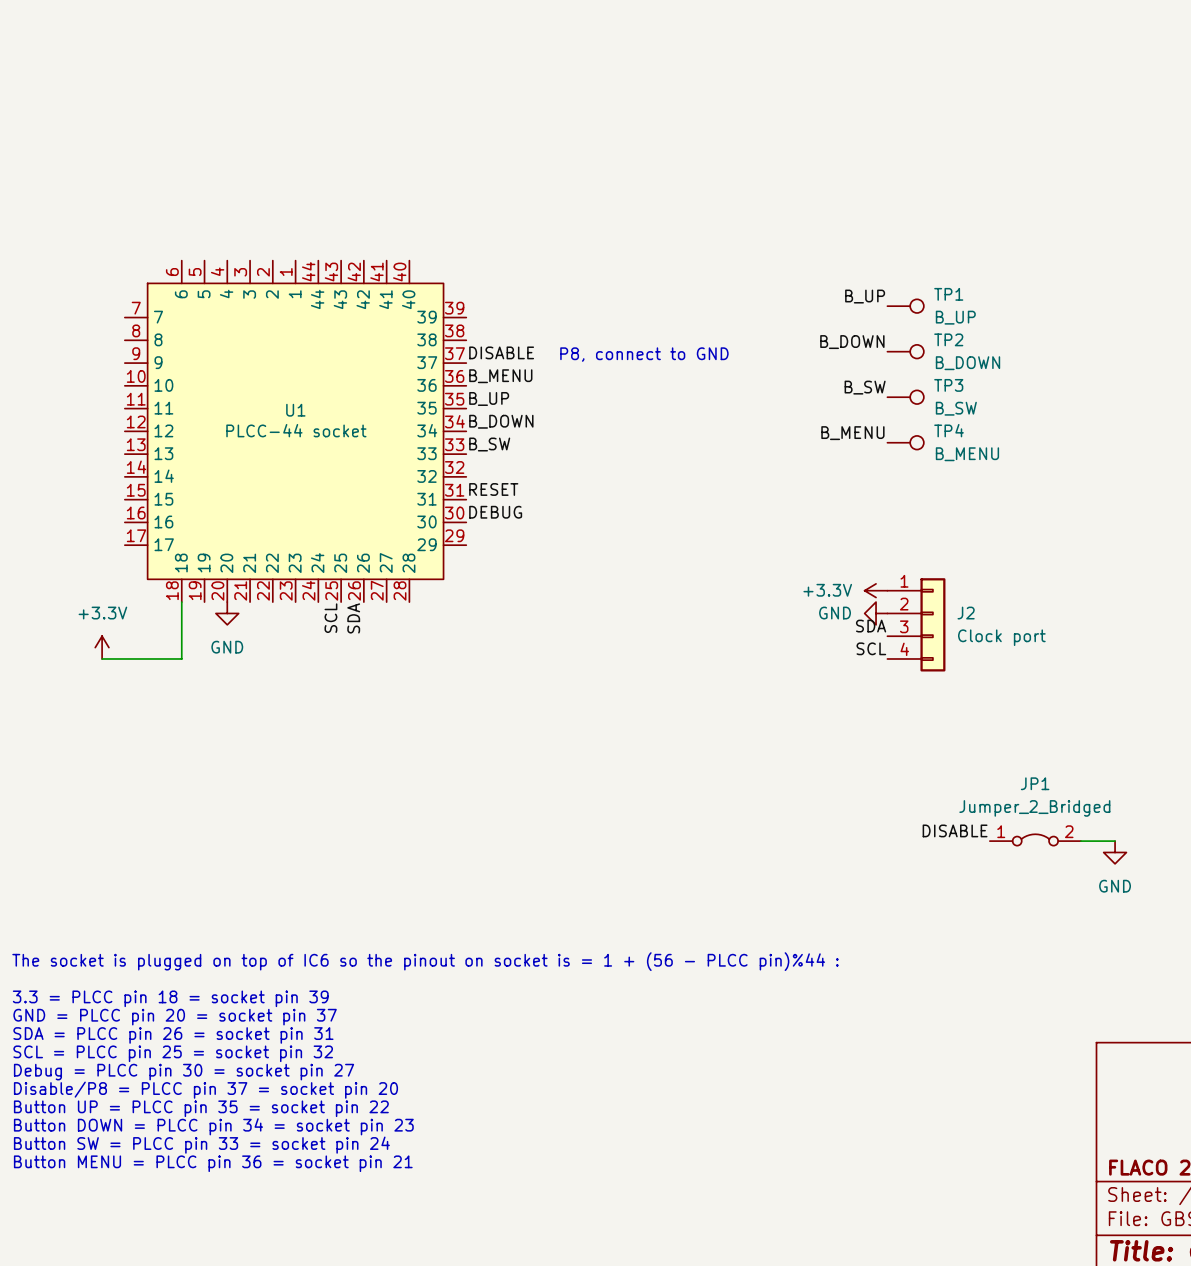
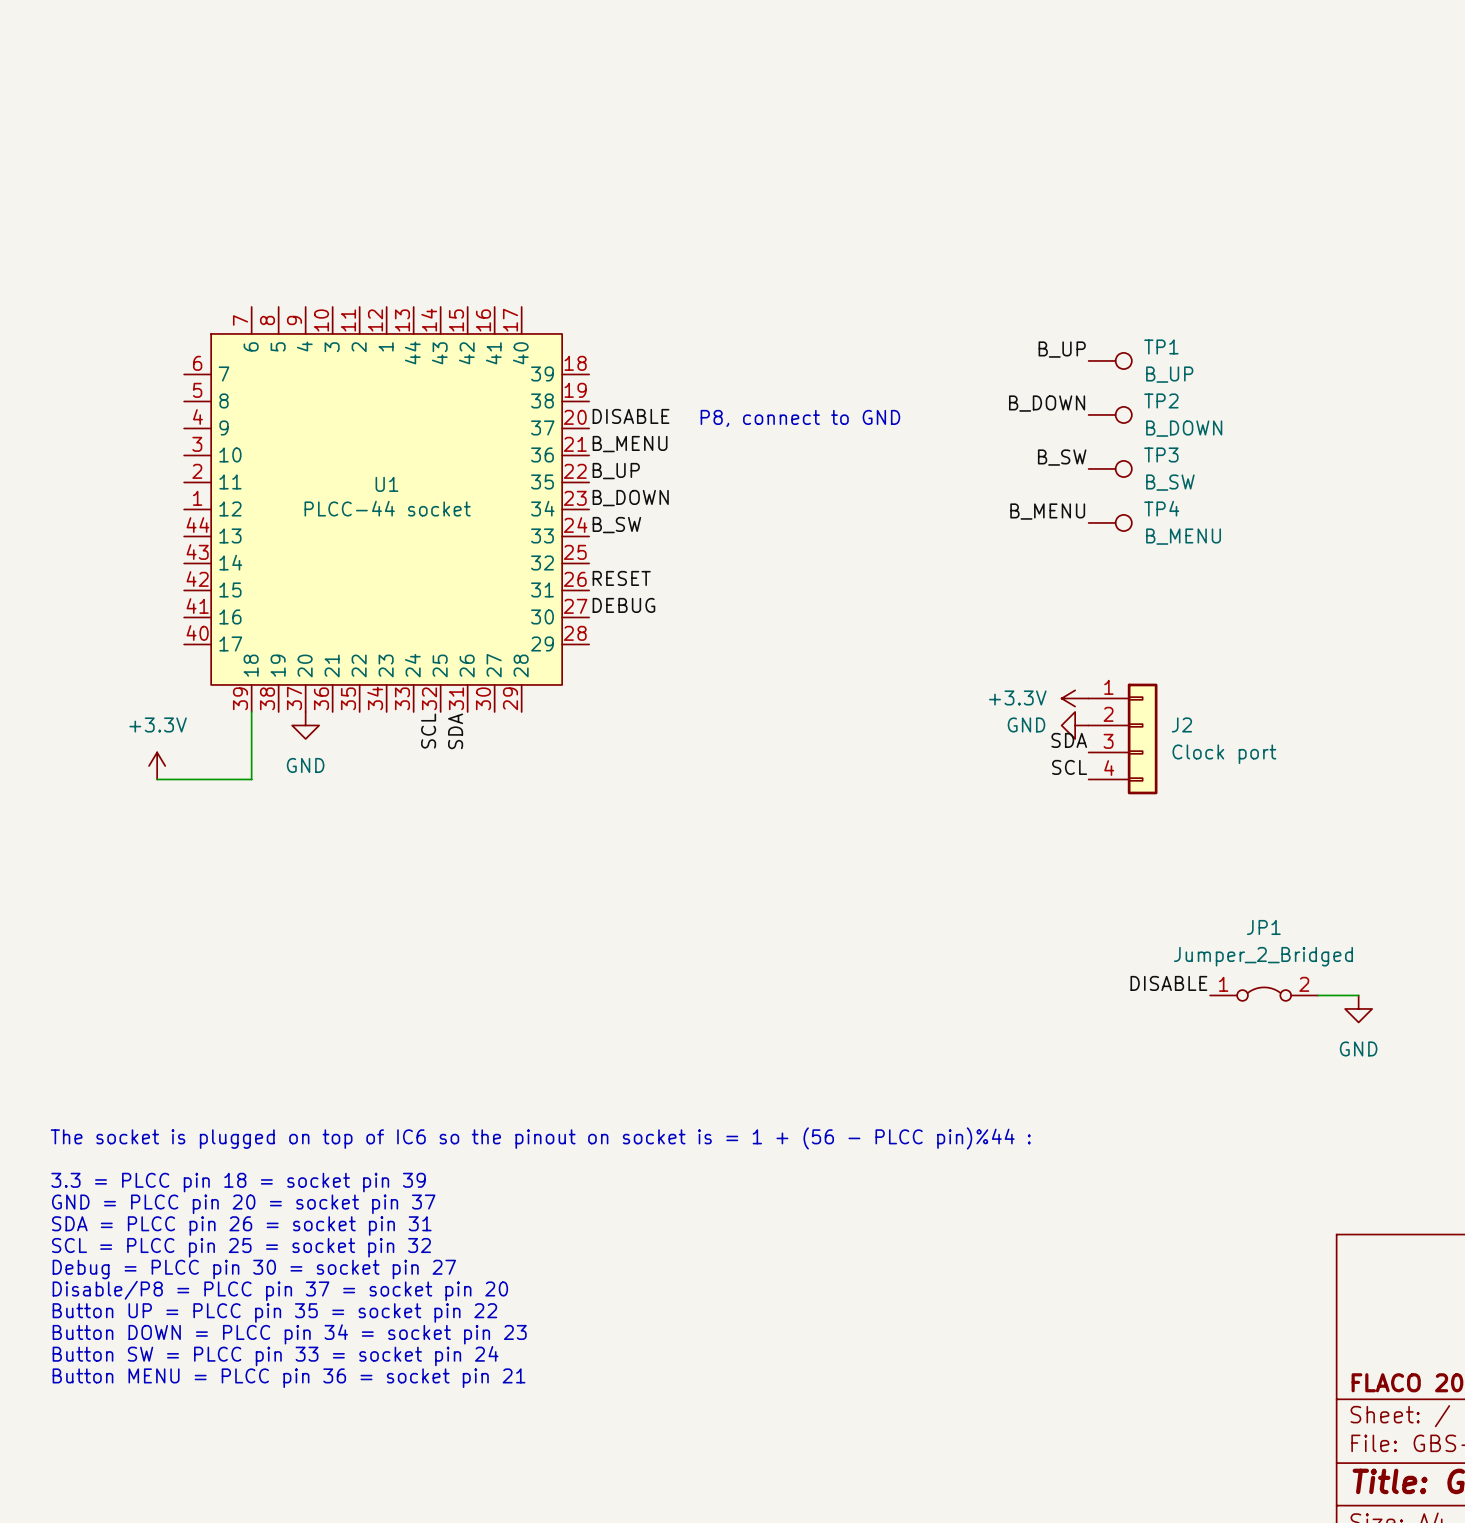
U1 symbol: [124, 260, 467, 603] -> [184, 306, 590, 712]

